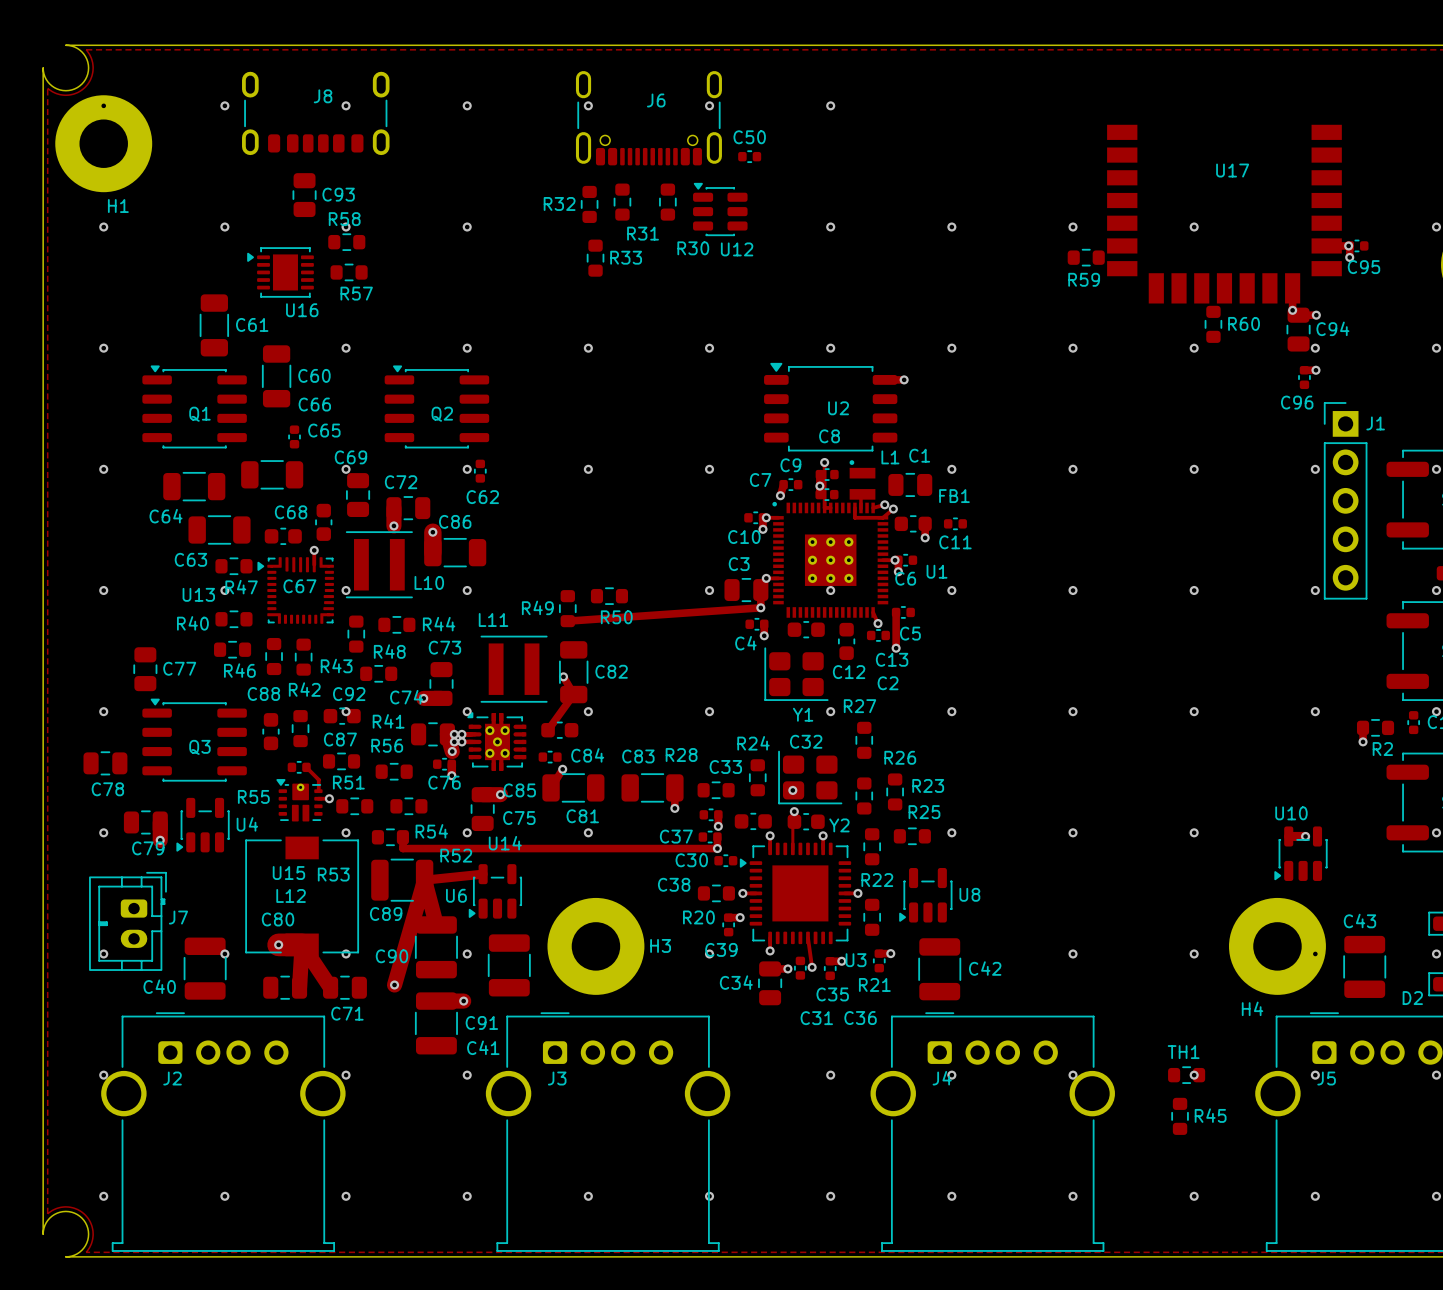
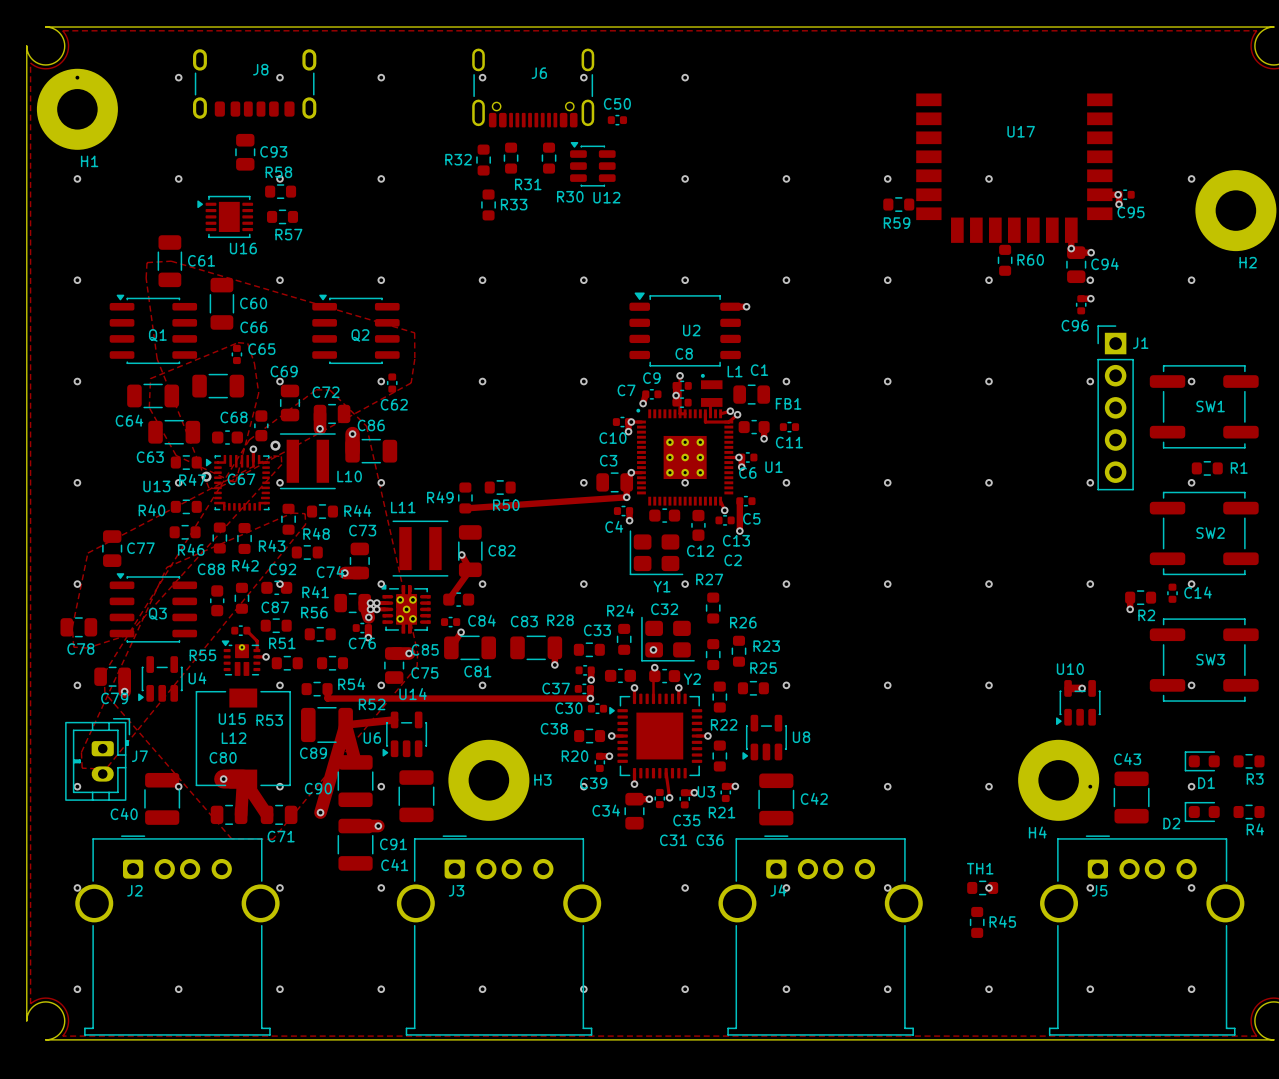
zone outline: none -> (171, 261) (147, 262) (146, 278) (157, 359) (209, 488) (217, 488) (411, 383) (414, 358) (414, 332) (171, 261)
zone outline: none -> (238, 342) (150, 378) (149, 407) (176, 455) (232, 481) (235, 481) (258, 393) (254, 363) (247, 343) (238, 342)
zone outline: none -> (316, 389) (249, 440) (104, 673) (104, 692) (231, 838) (272, 839) (417, 666) (417, 652) (366, 426) (329, 389) (316, 389)
via: none -> (275, 445)
zone outline: none -> (273, 455) (87, 553) (72, 627) (73, 647) (87, 648) (127, 635) (281, 464) (281, 456) (273, 455)
via: none -> (206, 476)
zone outline: none -> (292, 513) (166, 567) (81, 752) (82, 768) (105, 769) (305, 524) (305, 513) (292, 513)

